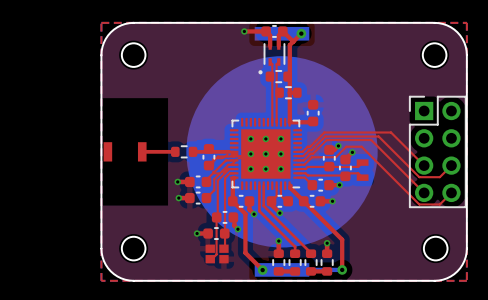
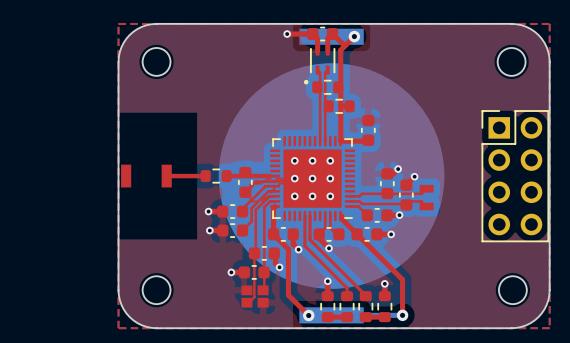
top track: (297, 151) (302, 151) (310, 146) (324, 132) (391, 132) (424, 165) -> none
top track: (297, 156) (303, 156) (311, 150) (325, 136) (378, 136) (419, 177) (439, 177) (451, 165) -> none
top track: (297, 160) (303, 160) (326, 140) (371, 140) (424, 192) -> none
top track: (297, 164) (304, 164) (312, 157) (335, 157) (346, 146) (361, 146) (419, 204) (439, 204) (451, 192) -> none

